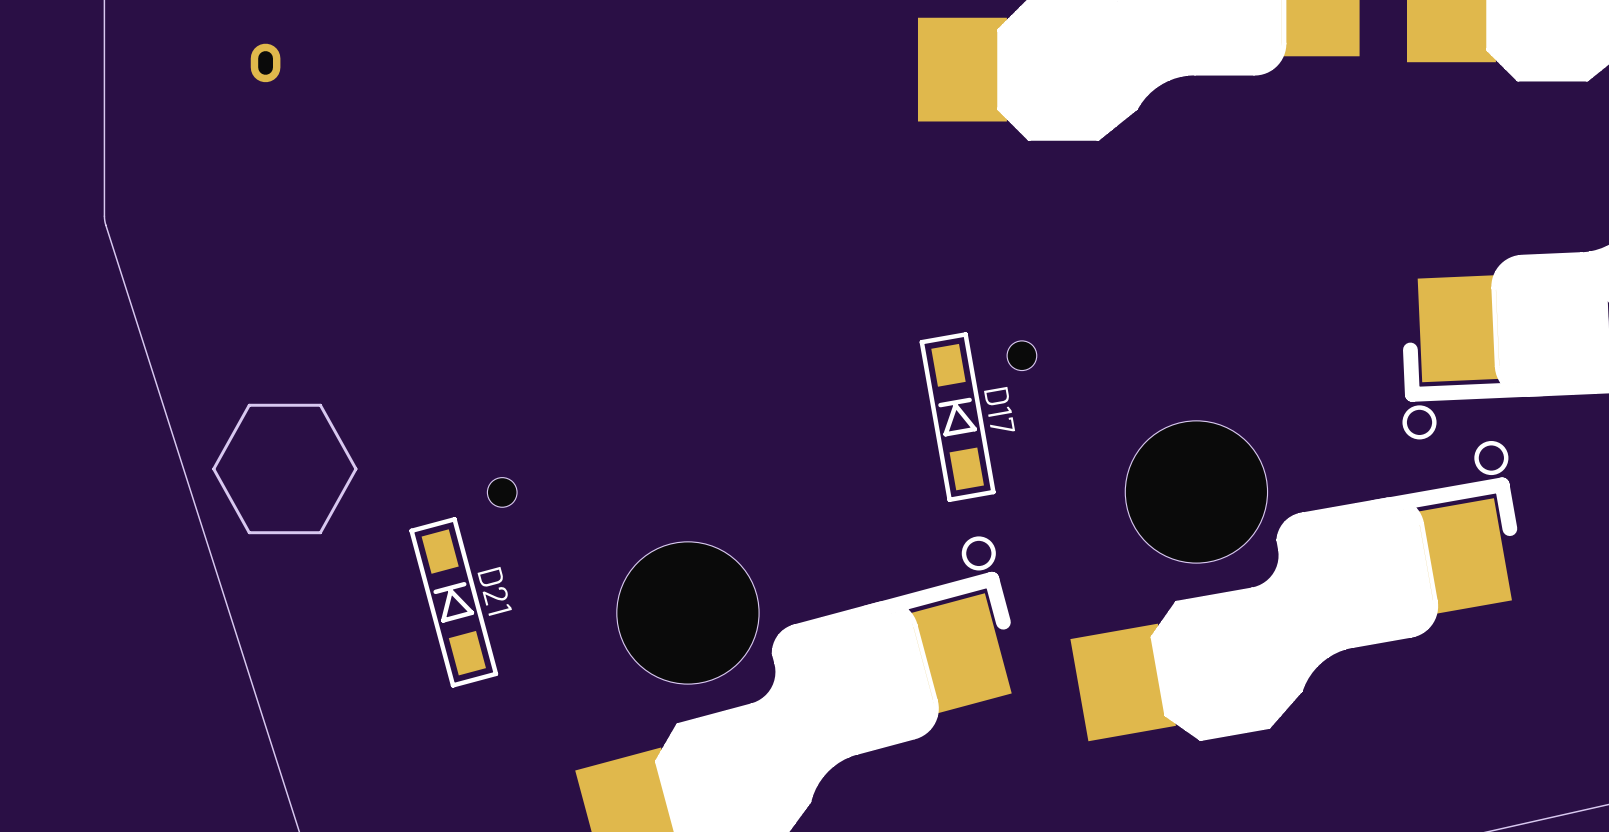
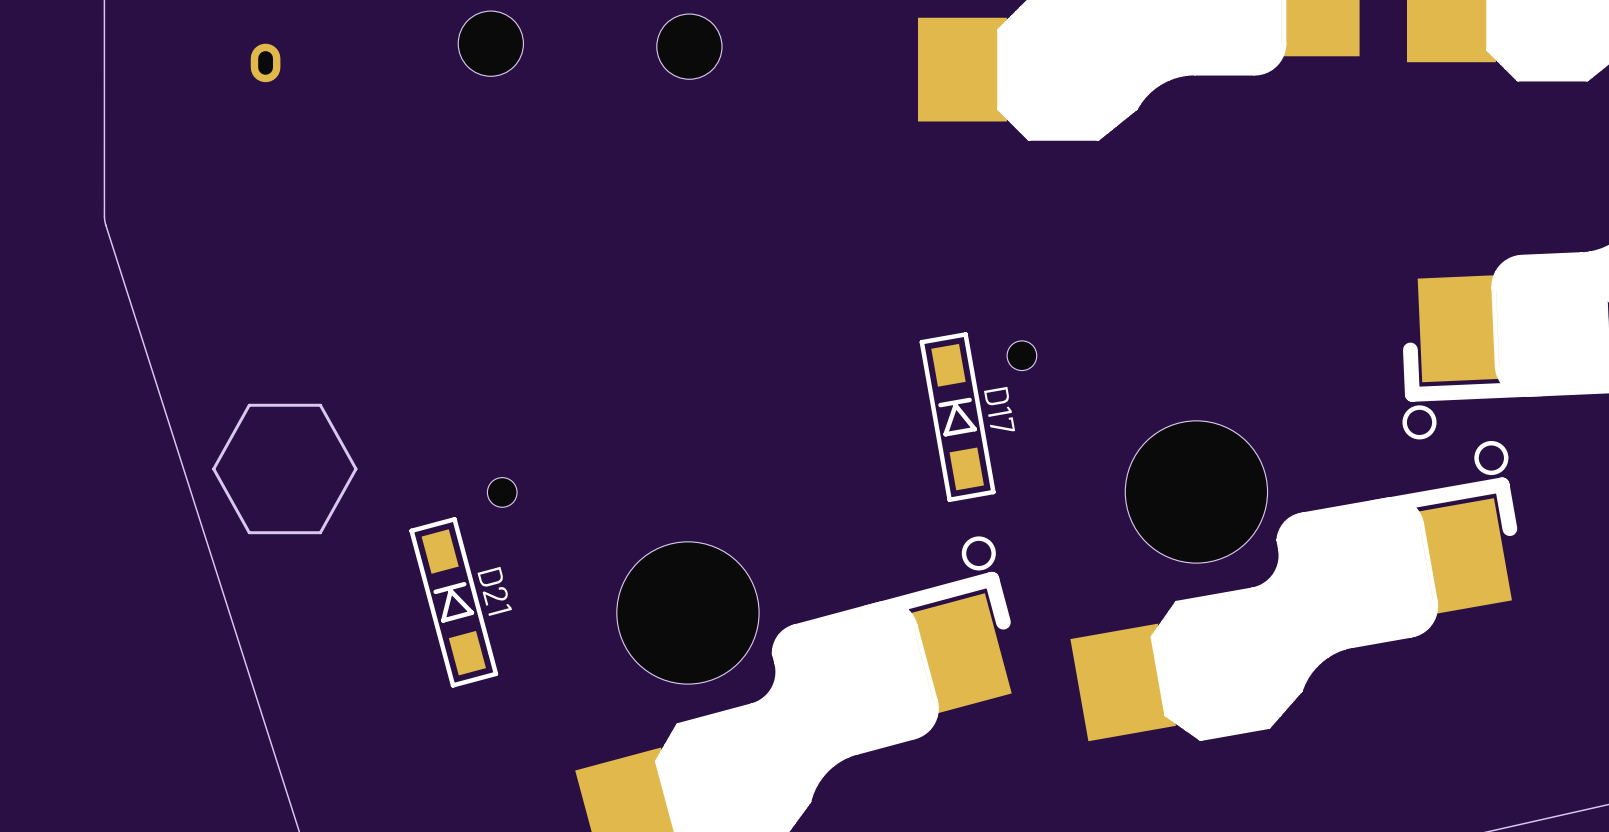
part: none -> (490, 43)
part: none -> (689, 46)

